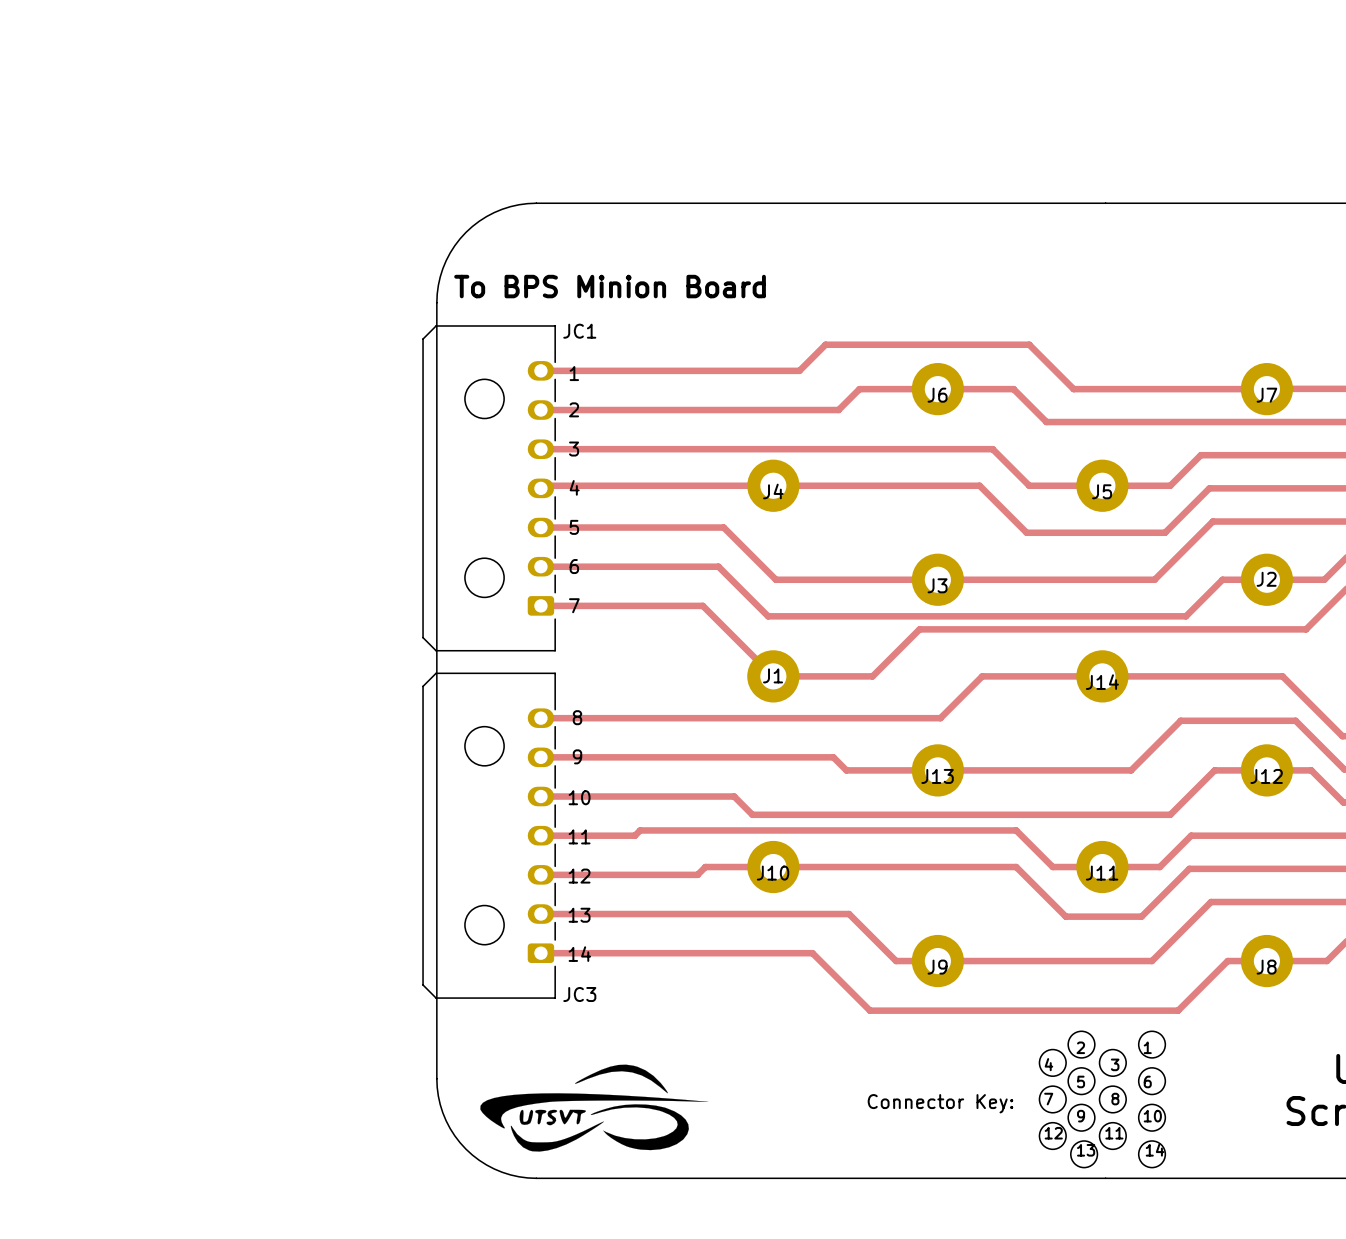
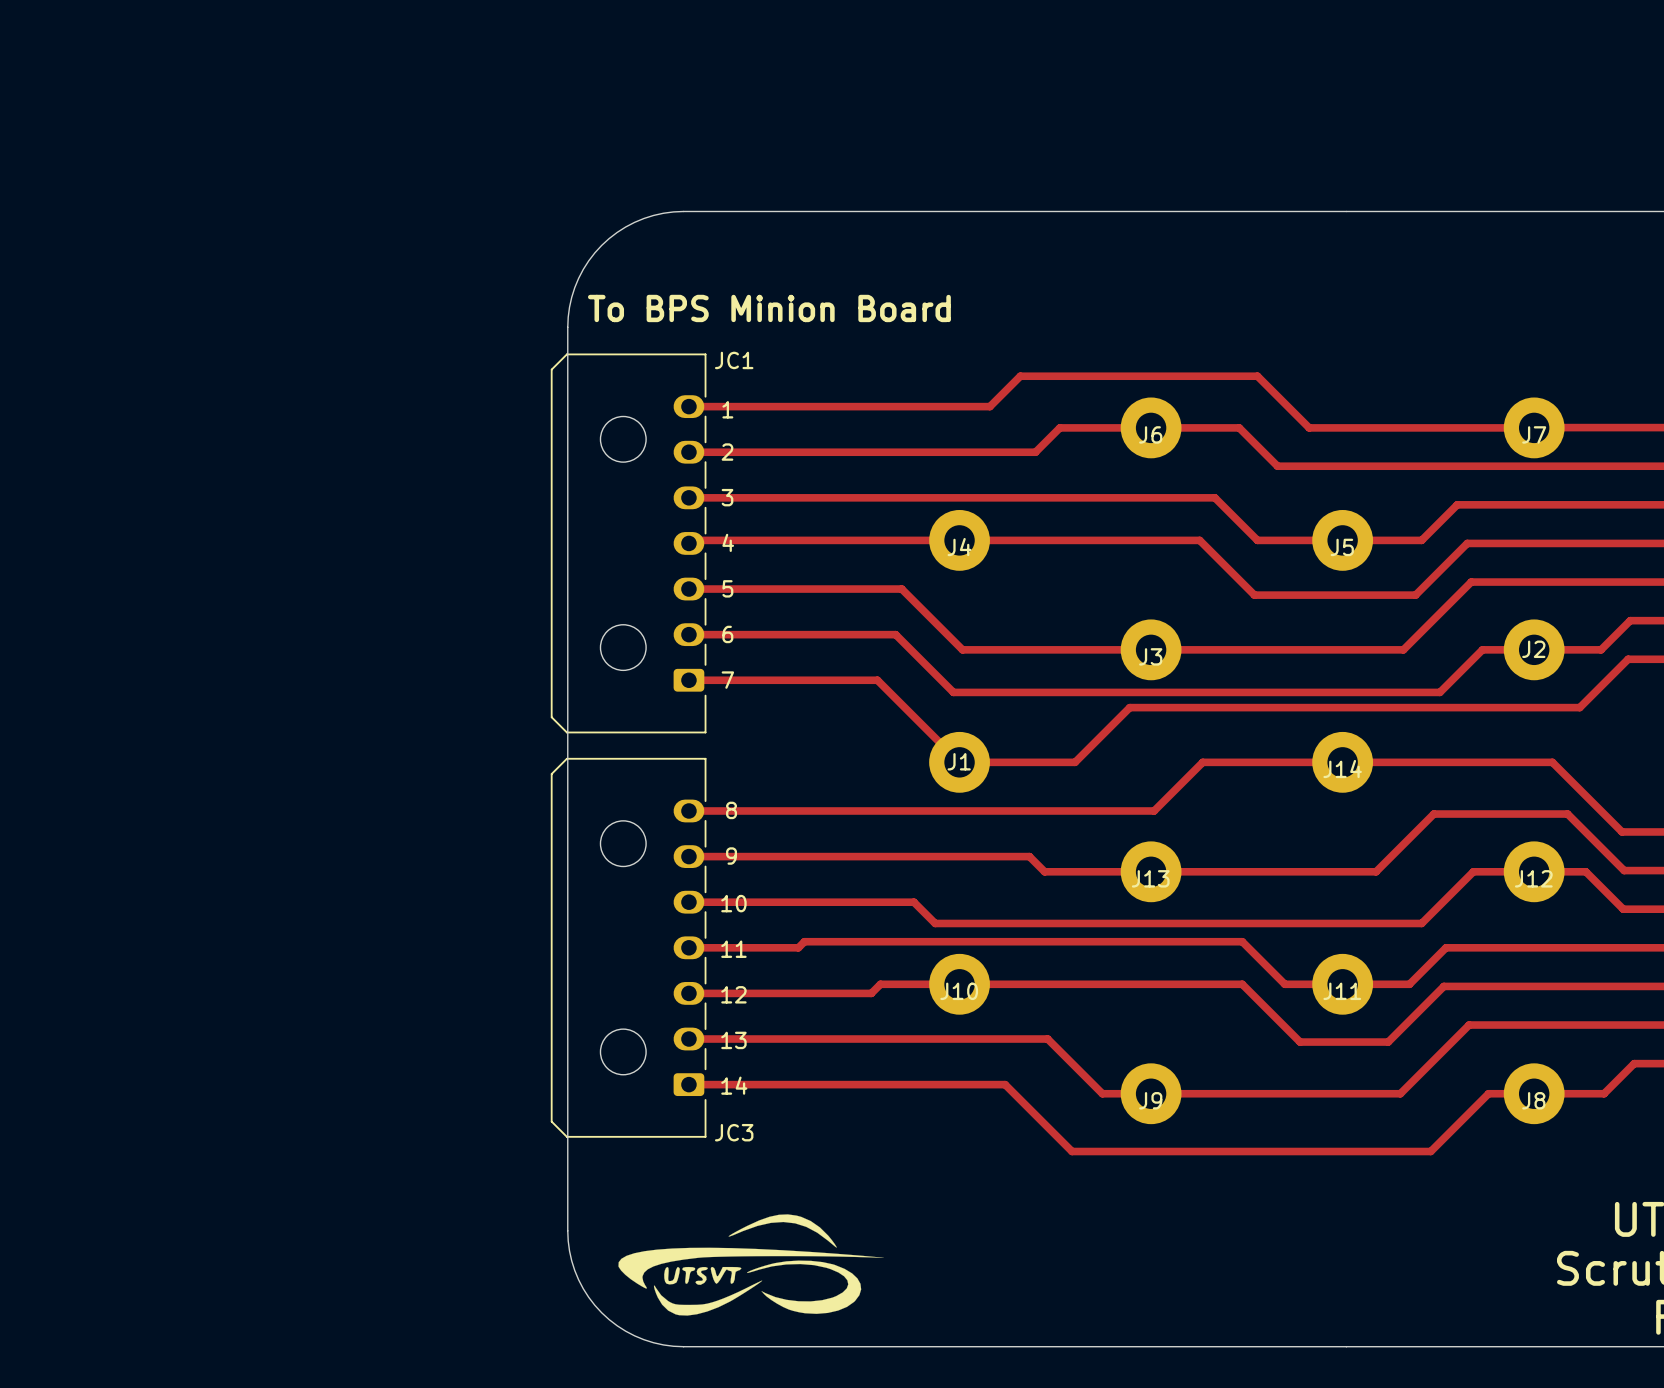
drawing: [1038, 1030, 1167, 1169] -> none
text: 2 1 (1114, 1047) -> none
text: 4 3 (1082, 1064) -> none
text: 5 6 (1114, 1081) -> none
text: 7 8 (1081, 1099) -> none
text: Connector Key: (940, 1103) -> none
text: 9 10 (1119, 1116) -> none
text: 12 11 (1084, 1133) -> none
text: 13 14 (1120, 1150) -> none

